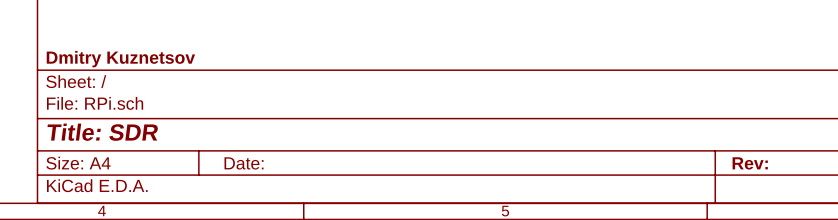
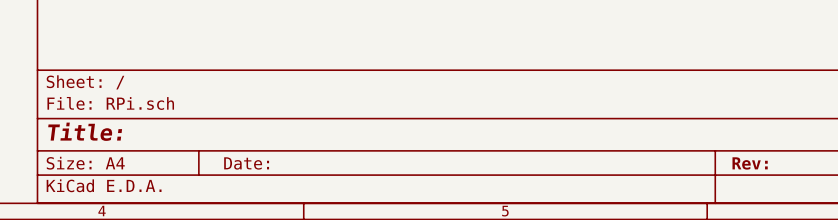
title block: Dmitry Kuznetsov (120, 59) -> none
title block: Title: SDR (102, 132) -> Title: (85, 131)

